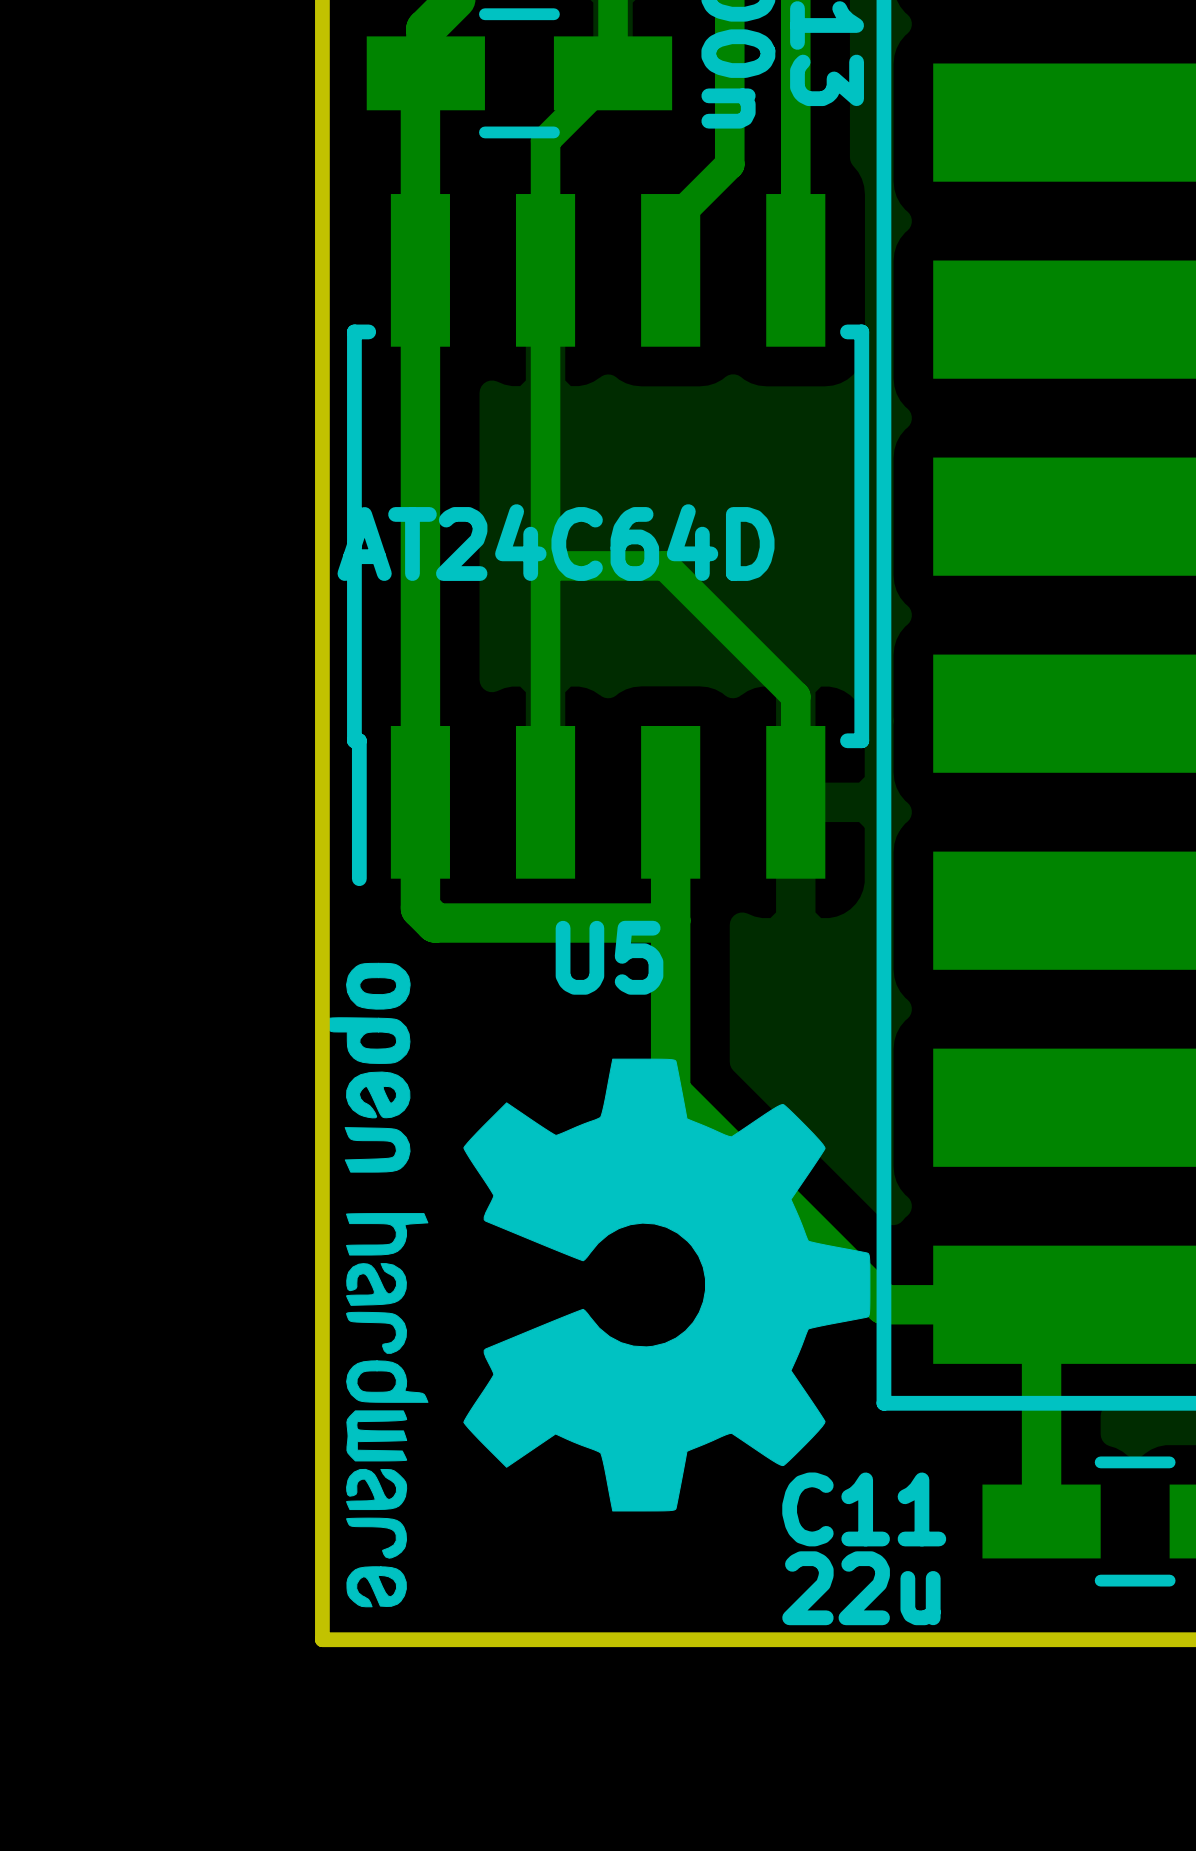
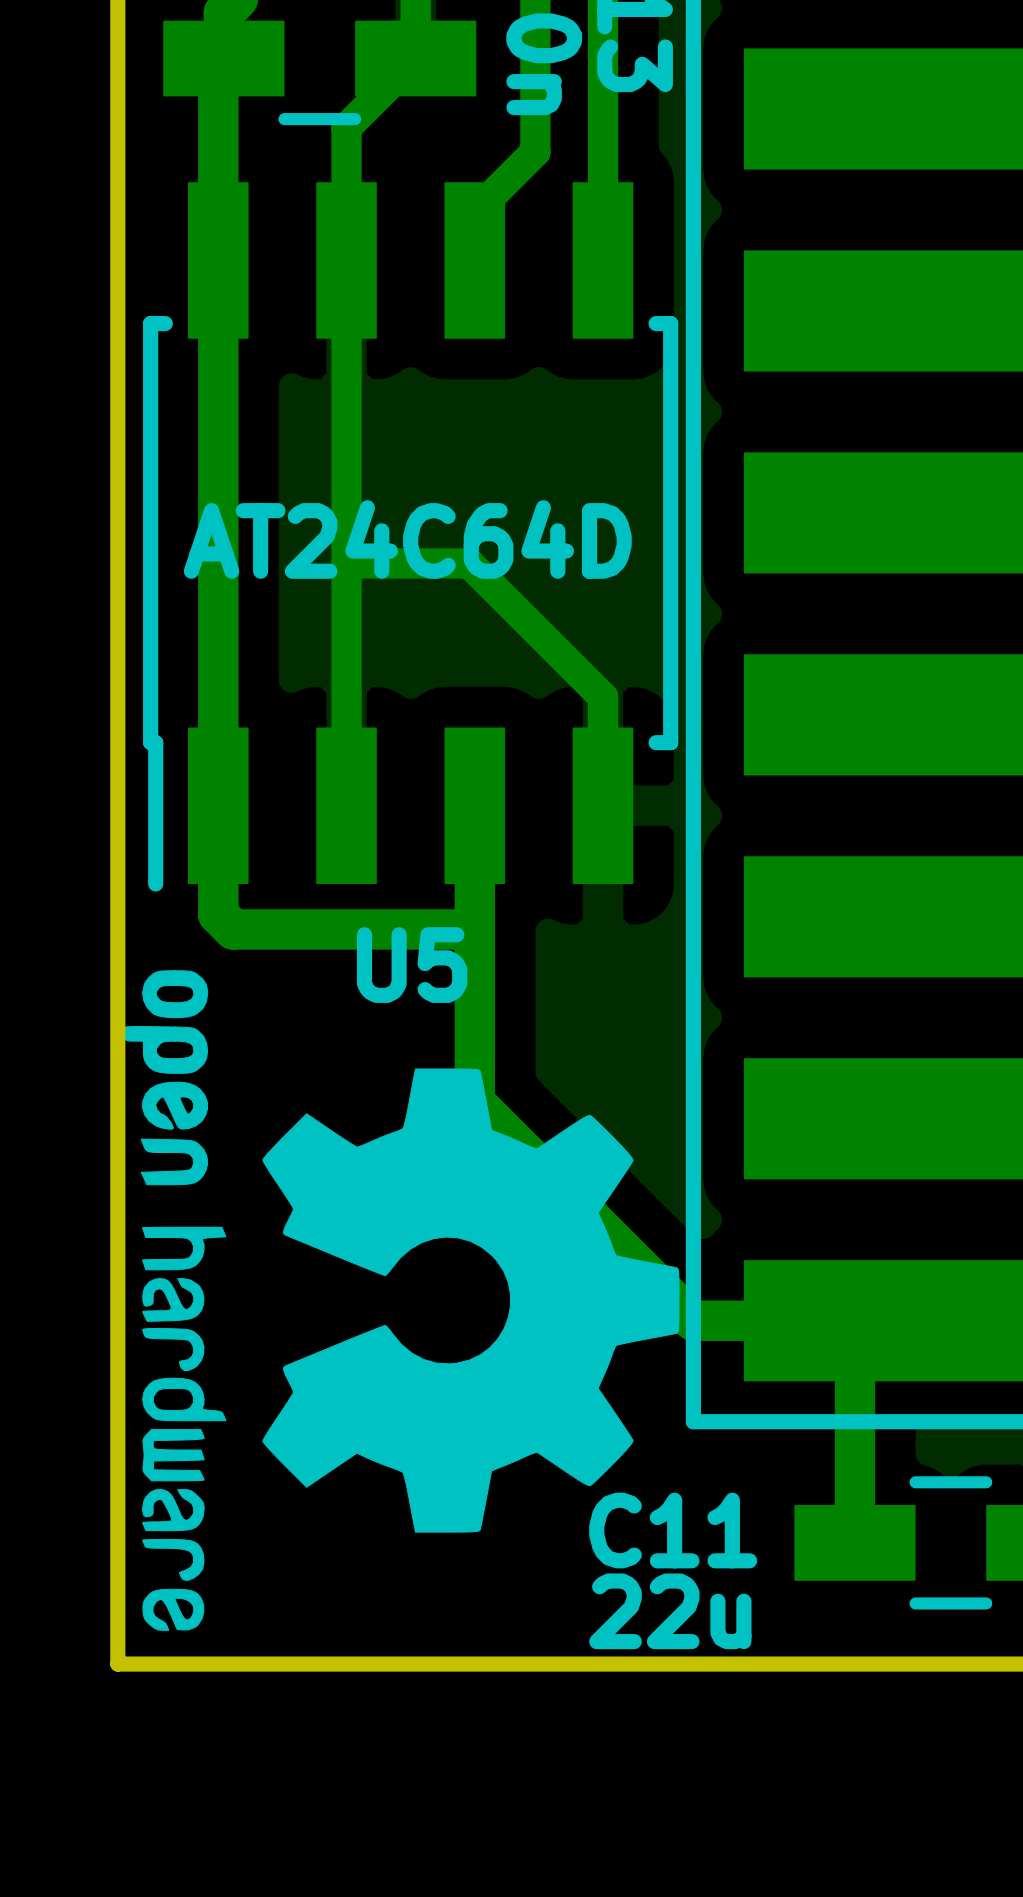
U5 value position: AT24C64D (556, 542) -> AT24C64D (407, 539)

